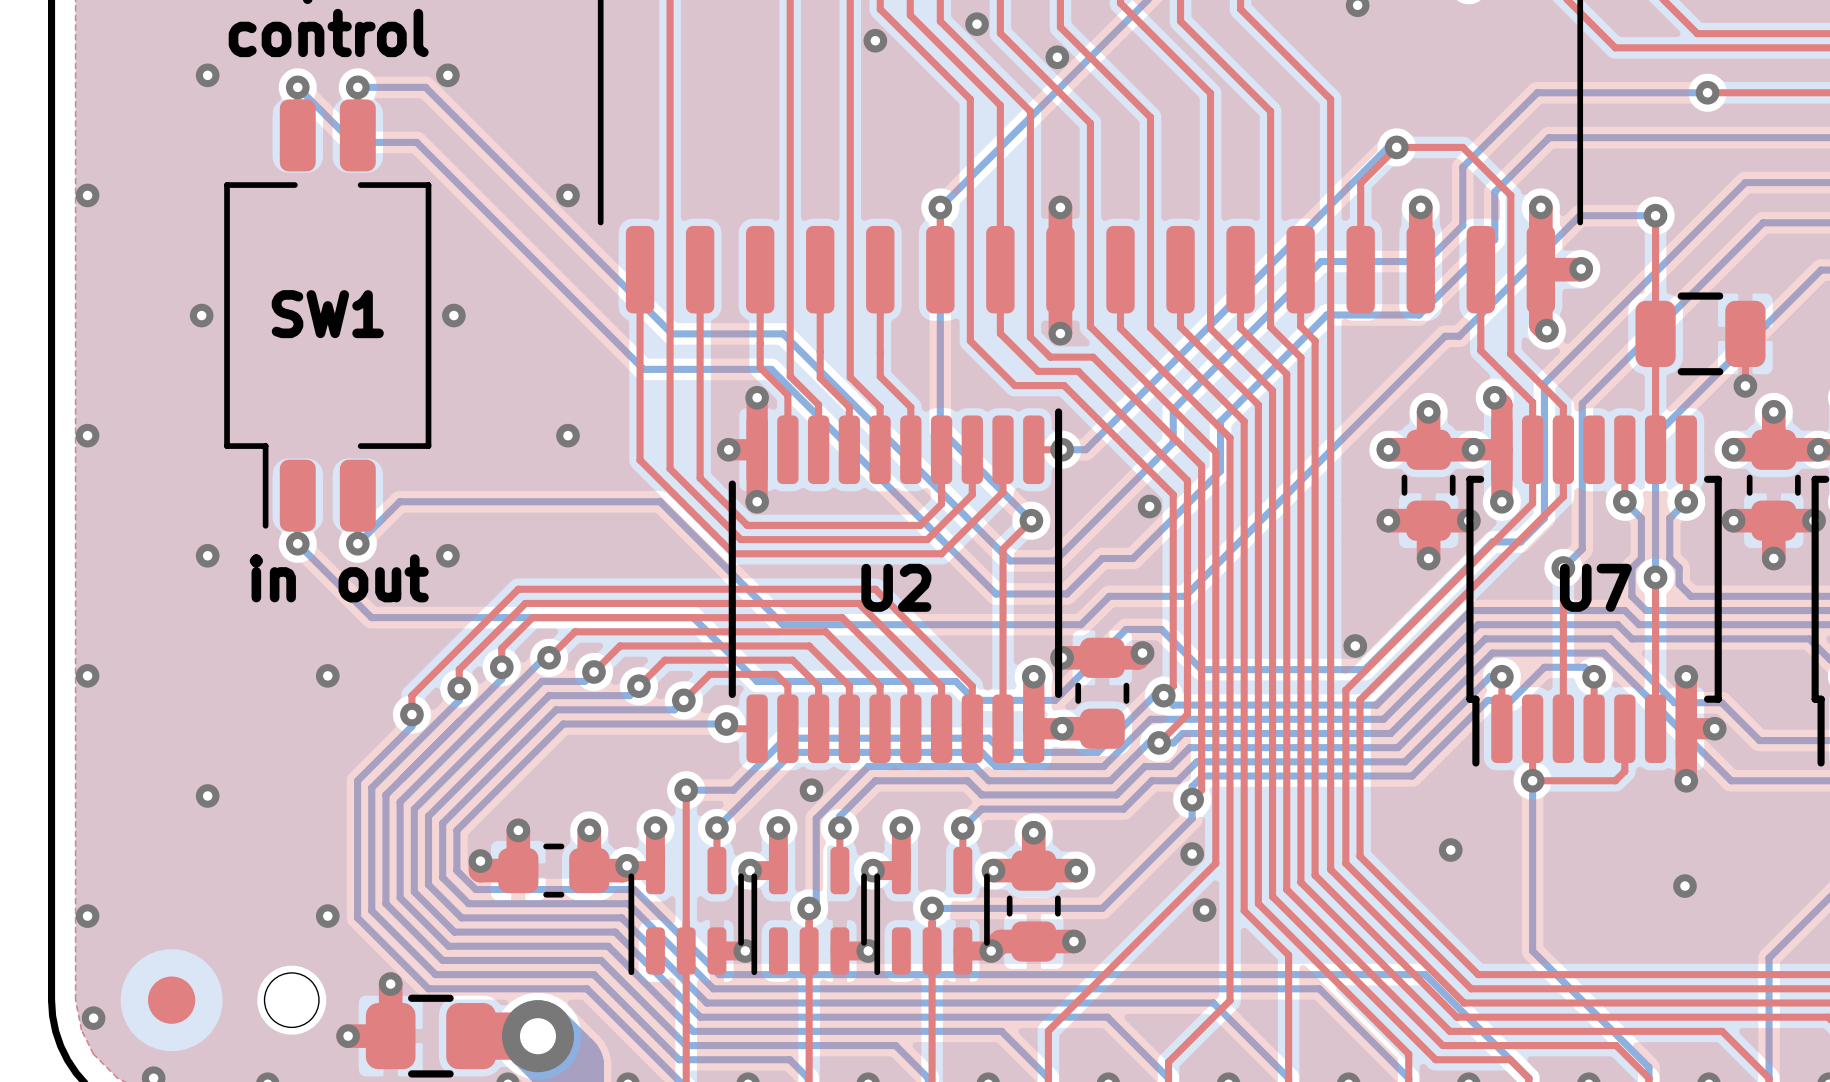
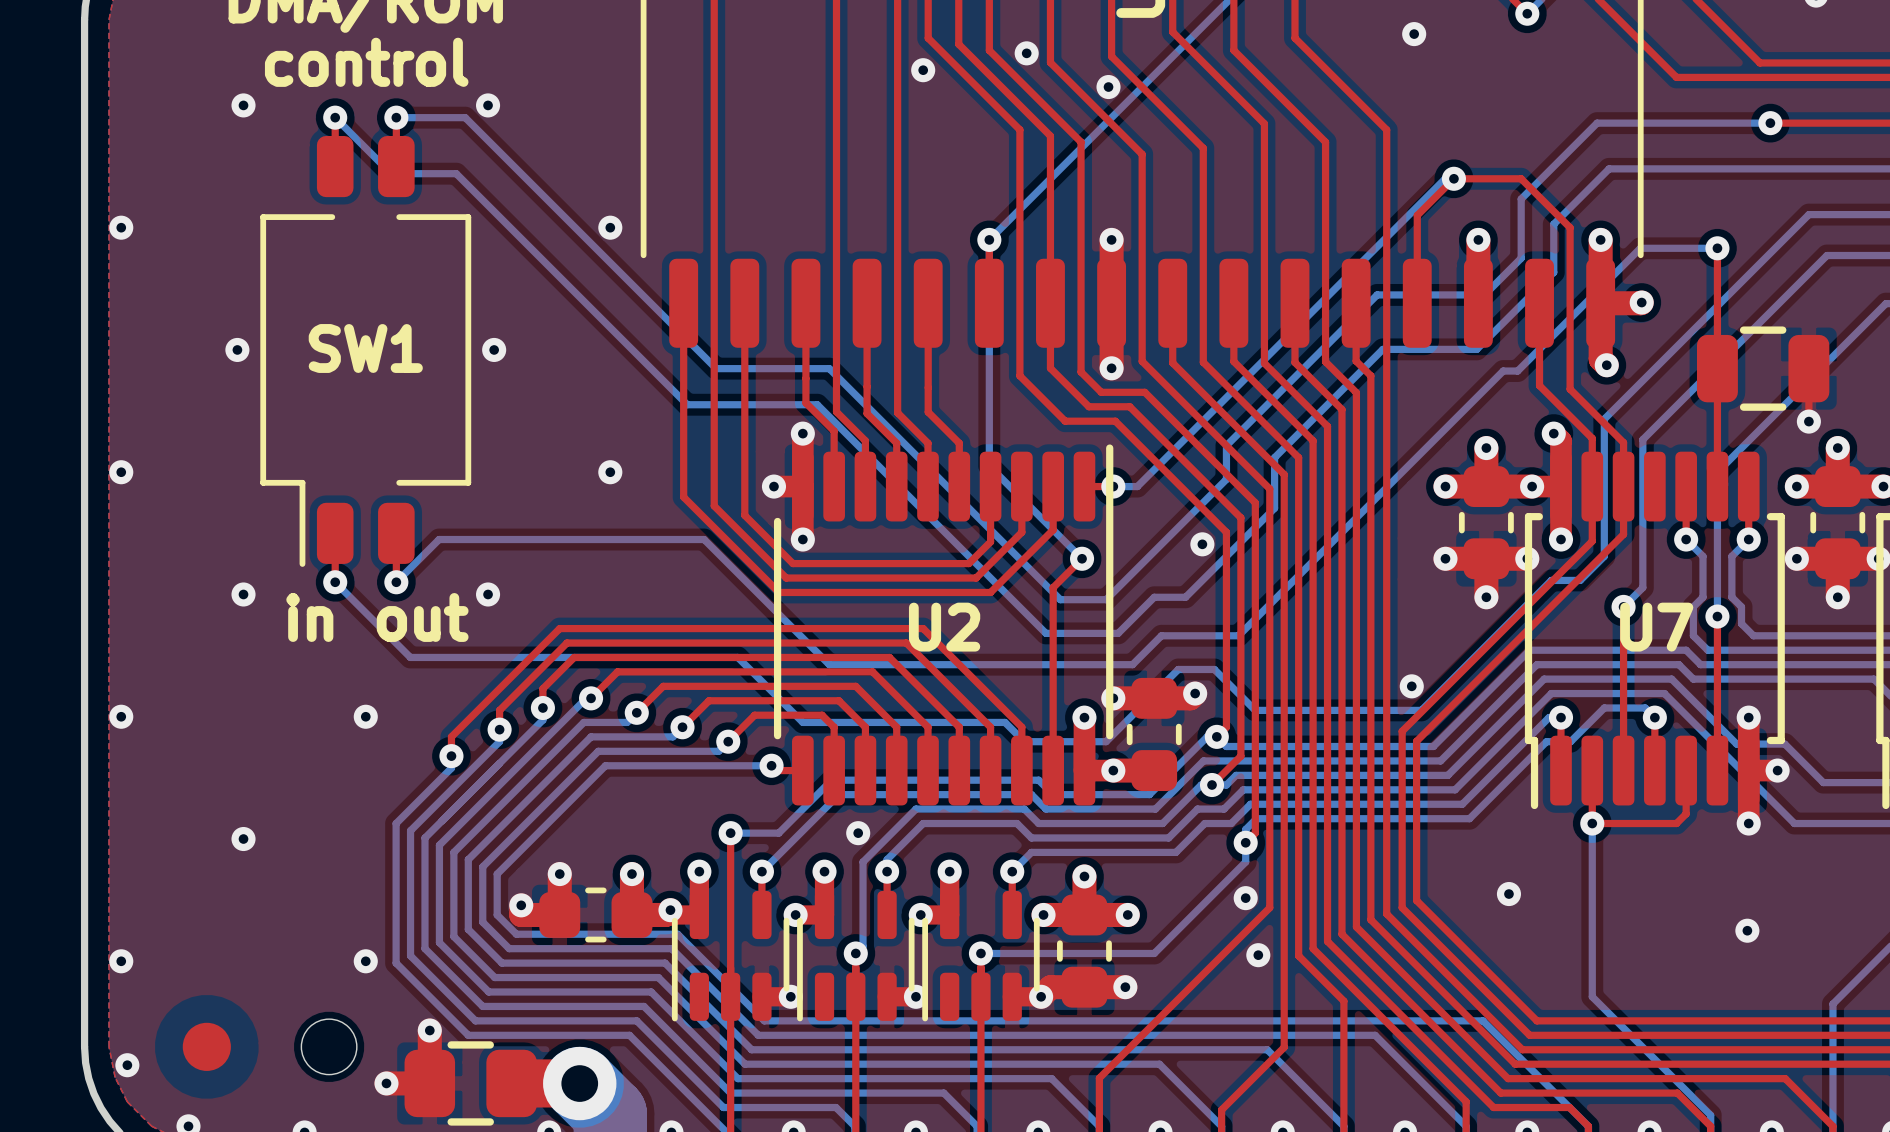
SW1 footprint: [224, 99, 432, 532] -> [260, 135, 472, 567]

